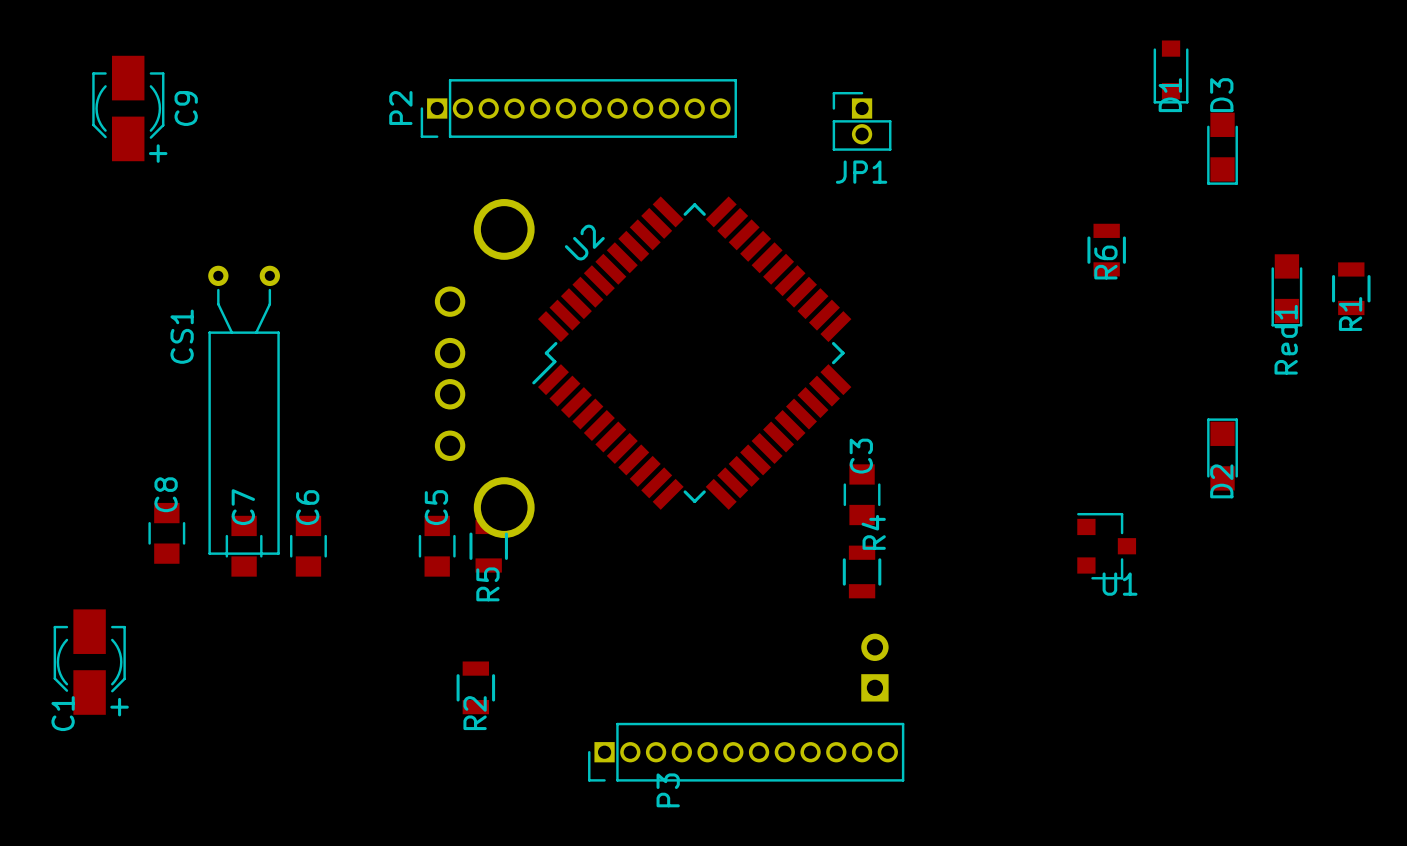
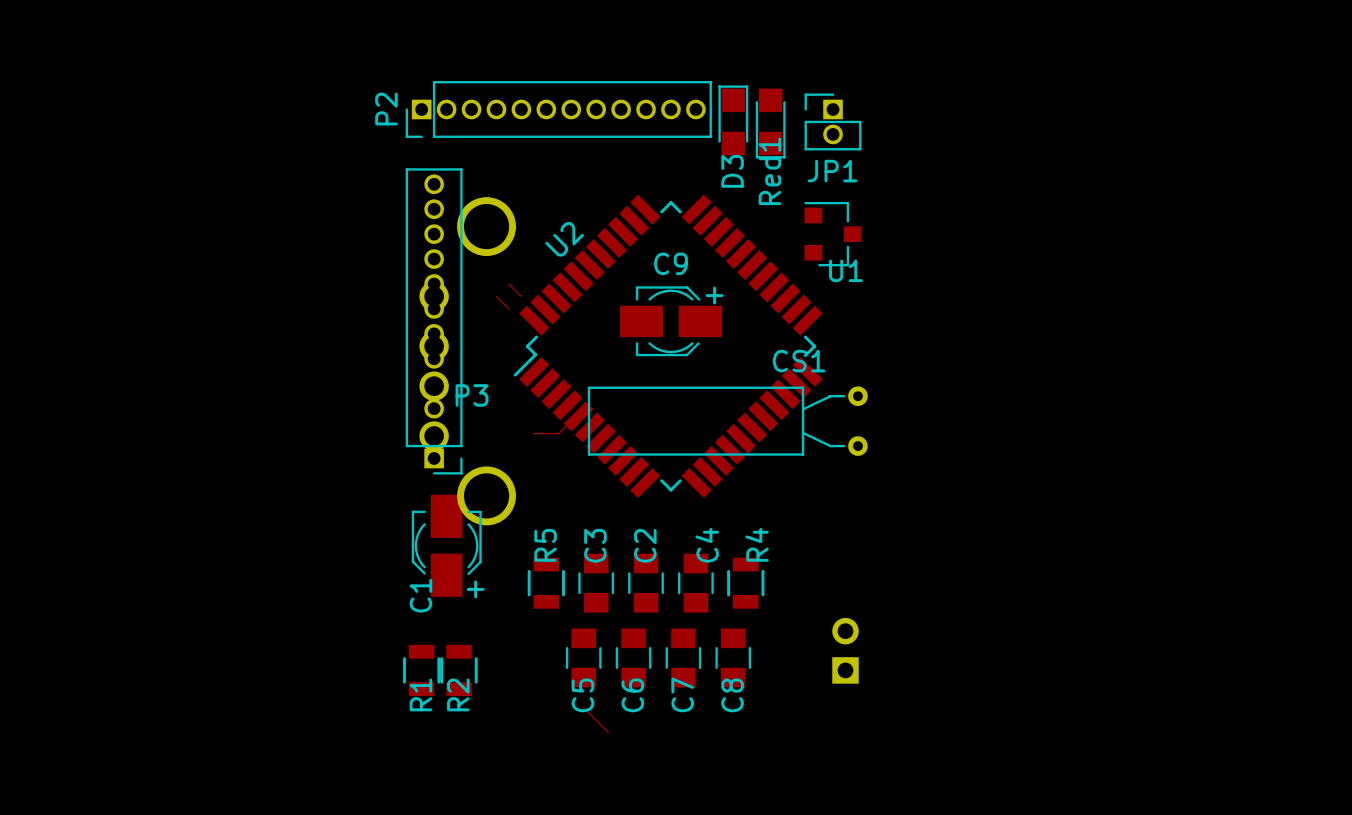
D1: (1171, 72) -> none
C9 rotation: 0° (128, 108) -> 90° counterclockwise (670, 321)
C9 position: (128, 108) -> (670, 321)
D3 rotation: 0° (1222, 148) -> 180° (733, 120)
D3 position: (1222, 148) -> (733, 120)
R6: (1106, 250) -> none
track: none -> (508, 284) (521, 296)
R1 position: (1351, 288) -> (421, 670)
Red1 position: (1286, 290) -> (770, 123)
track: none -> (496, 296) (508, 308)
CS1 rotation: 0° (244, 410) -> 90° clockwise (727, 421)
CS1 position: (244, 410) -> (727, 421)
track: none -> (578, 416) (575, 416) (558, 433) (533, 433)
D2: (1222, 454) -> none
C8 name position: C8 (166, 494) -> C8 (732, 695)
C3 position: (862, 494) -> (596, 583)
C7 name position: C7 (243, 507) -> C7 (682, 694)
C6 name position: C6 (307, 507) -> C6 (632, 695)
C5 name position: C5 (436, 507) -> C5 (582, 695)
C8 position: (166, 533) -> (733, 657)
C7 position: (244, 546) -> (683, 657)
C6 position: (308, 546) -> (633, 657)
C5 position: (437, 546) -> (583, 657)
R5 position: (488, 546) -> (546, 583)
U1 position: (1106, 546) -> (832, 234)
R4 position: (862, 571) -> (745, 583)
R5 name position: R5 (487, 584) -> R5 (545, 545)
C2: none -> (646, 583)
C4: none -> (695, 583)
C1 position: (89, 662) -> (446, 545)
track: none -> (583, 707) (608, 732)
P3 rotation: 0° (746, 752) -> 90° counterclockwise (434, 321)
P3 position: (746, 752) -> (434, 321)

